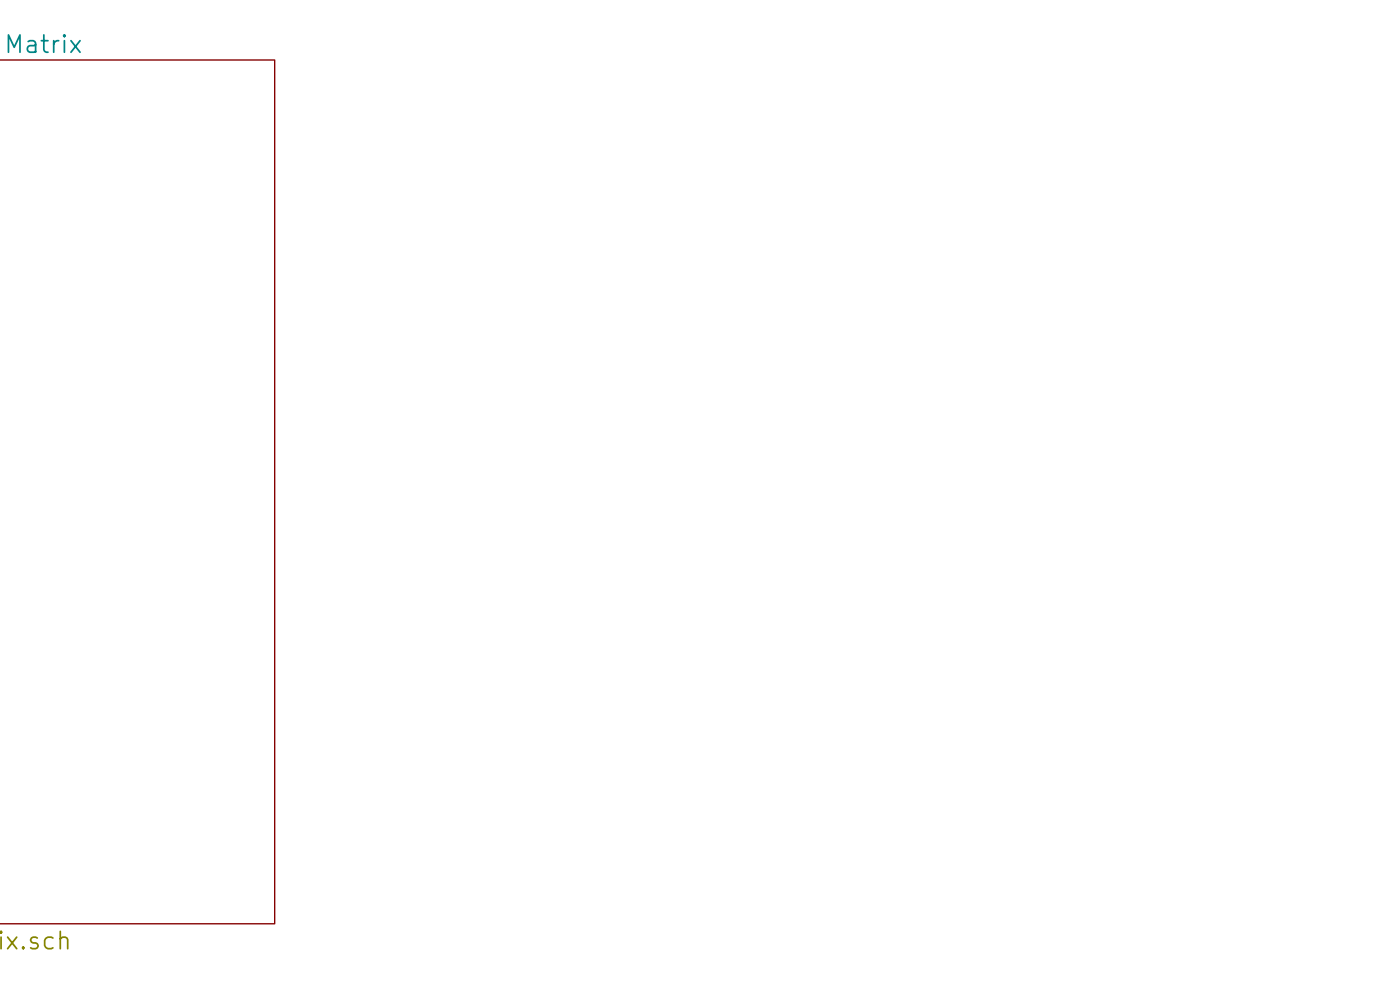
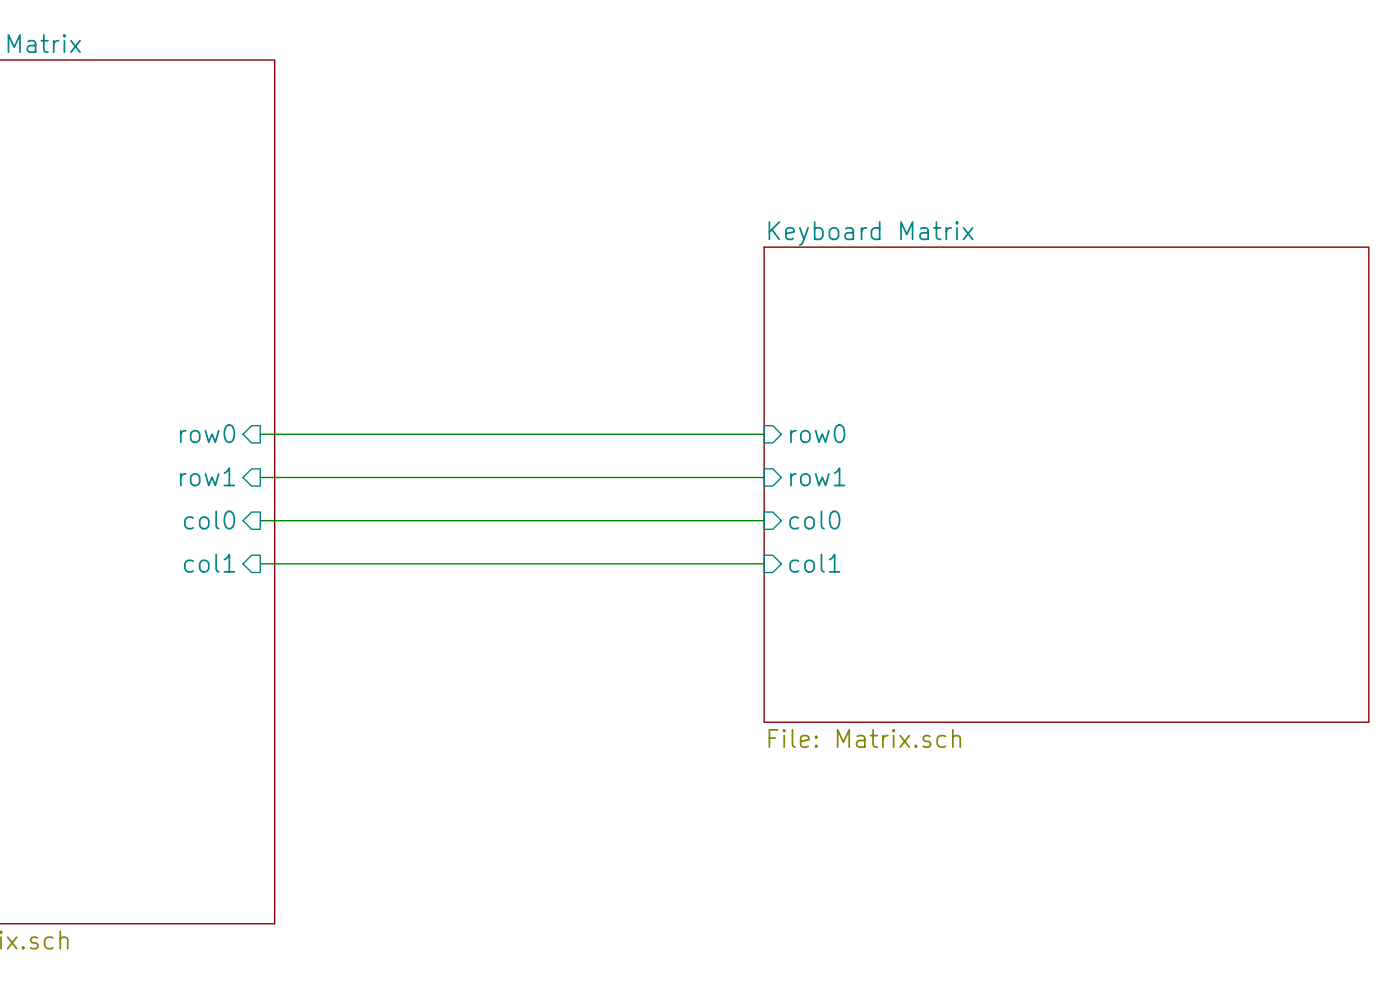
sheet pin: none -> row0 (207, 433)
sheet pin: none -> row0 (817, 433)
wire: none -> (260, 434) (764, 434)
sheet pin: none -> row1 (207, 476)
sheet pin: none -> row1 (817, 476)
wire: none -> (260, 477) (764, 477)
sheet Keyboard Matrix: none -> File: Matrix.sch (1066, 484)
sheet pin: none -> col0 (209, 520)
wire: none -> (260, 520) (764, 520)
sheet pin: none -> col0 (814, 520)
sheet pin: none -> col1 (209, 563)
wire: none -> (260, 563) (764, 563)
sheet pin: none -> col1 (814, 563)

